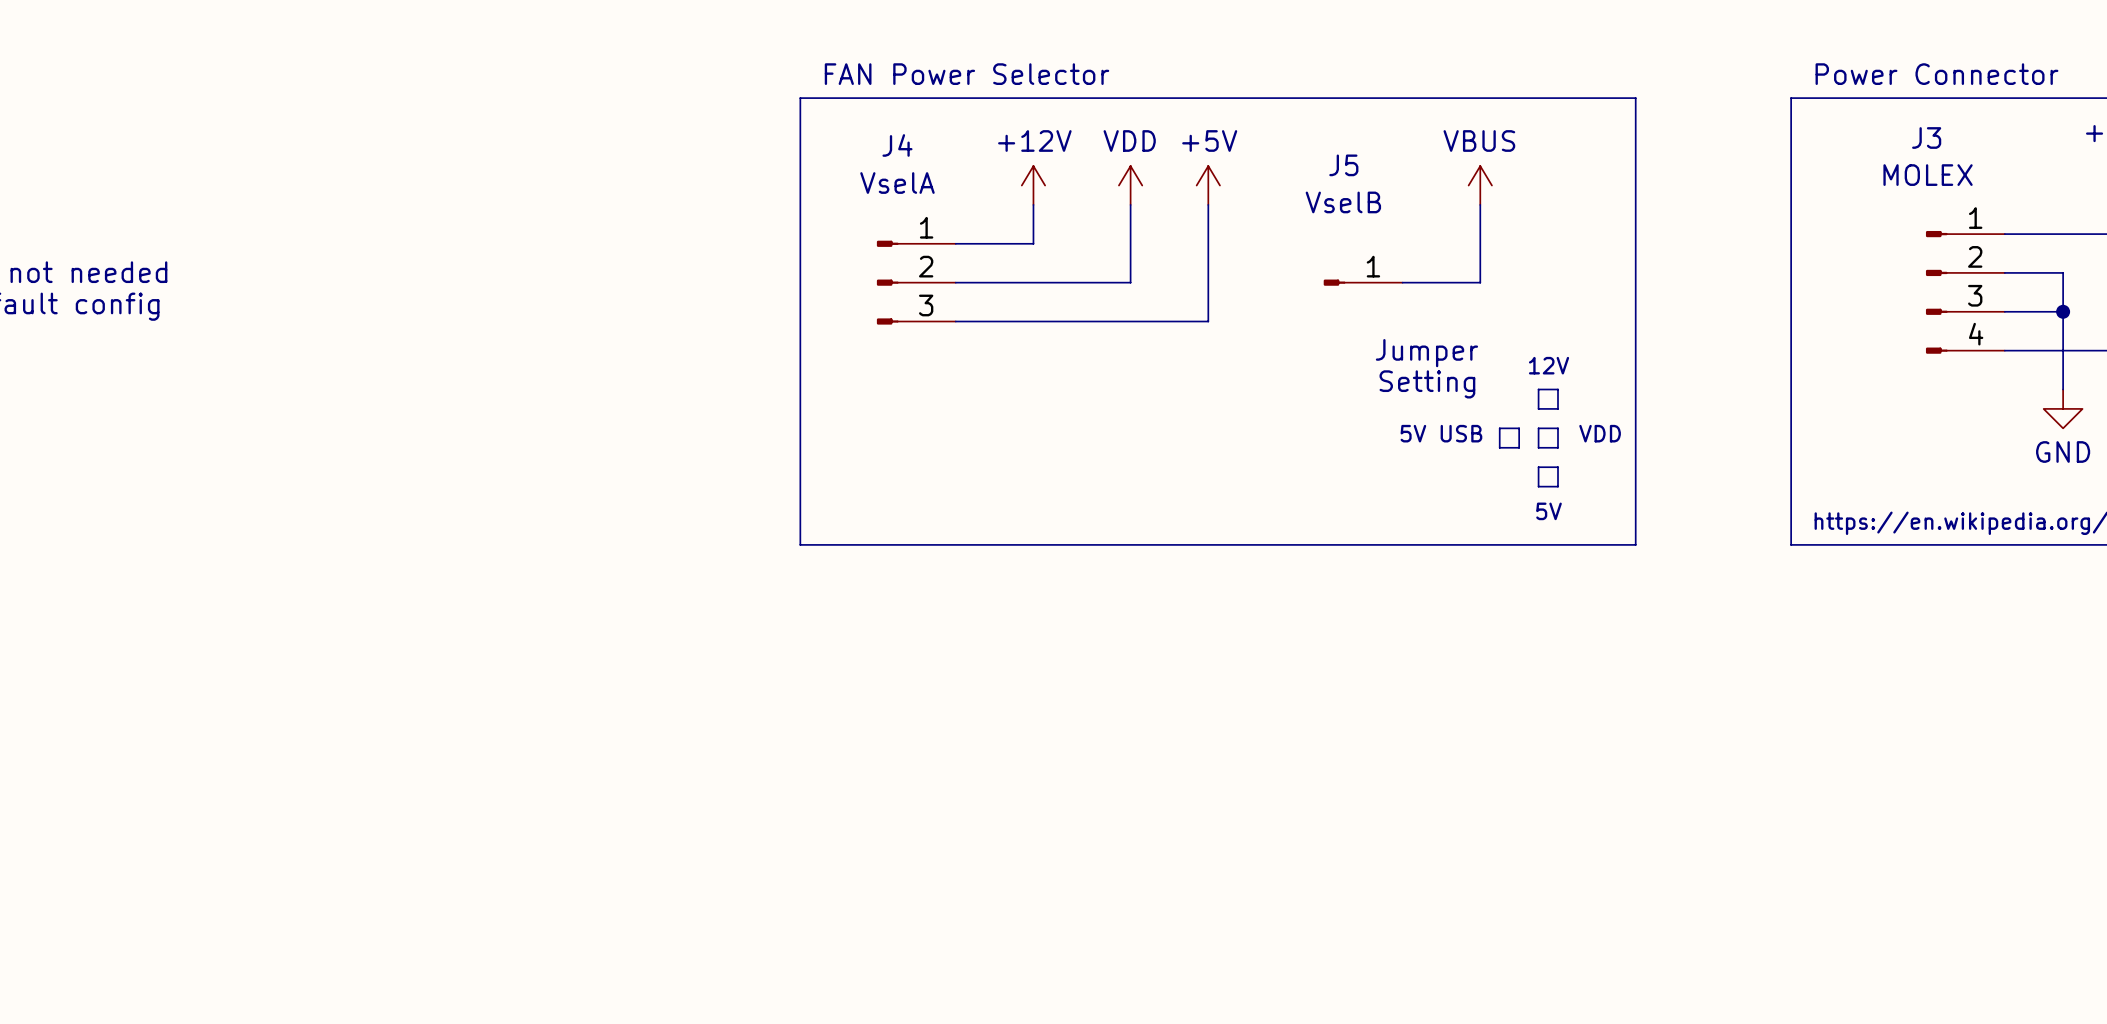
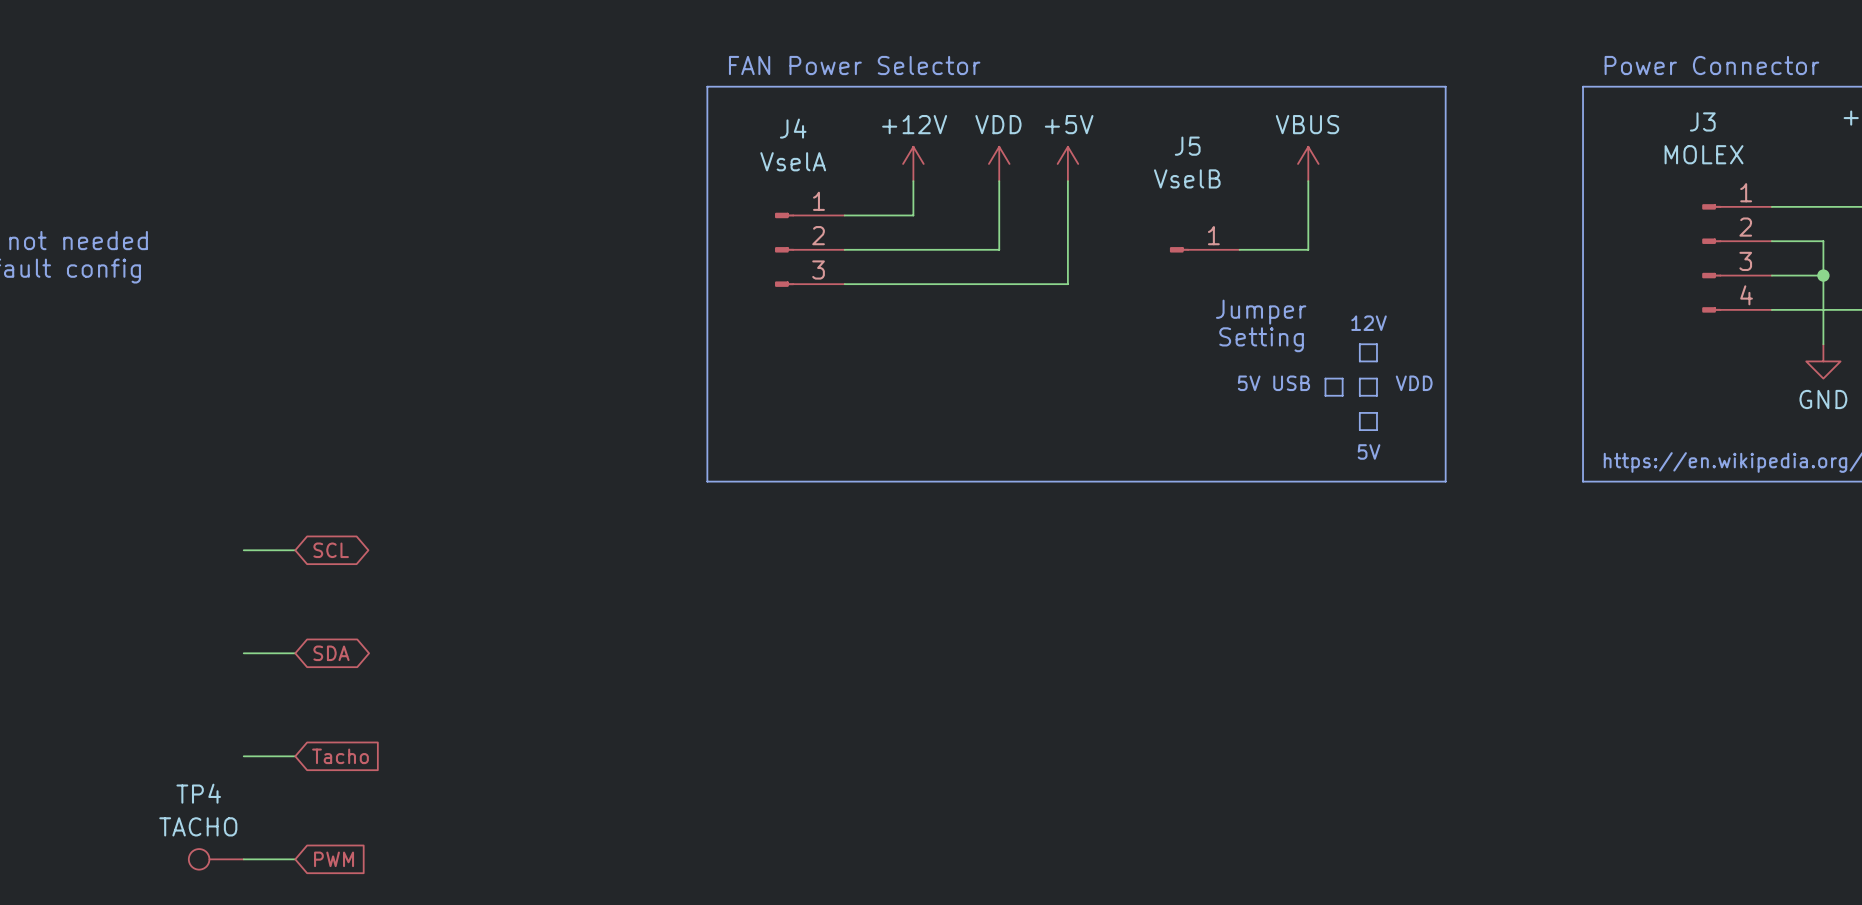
wire: none -> (243, 550) (295, 550)
global label: none -> SCL (331, 550)
wire: none -> (243, 653) (295, 653)
global label: none -> SDA (331, 653)
wire: none -> (243, 756) (295, 756)
global label: none -> Tacho (340, 756)
TP4: none -> TACHO (216, 859)
wire: none -> (243, 859) (295, 859)
global label: none -> PWM (334, 859)

